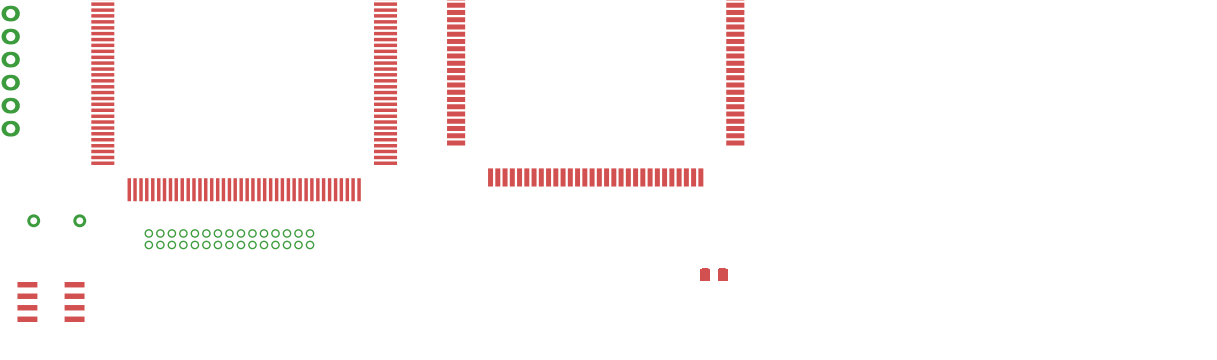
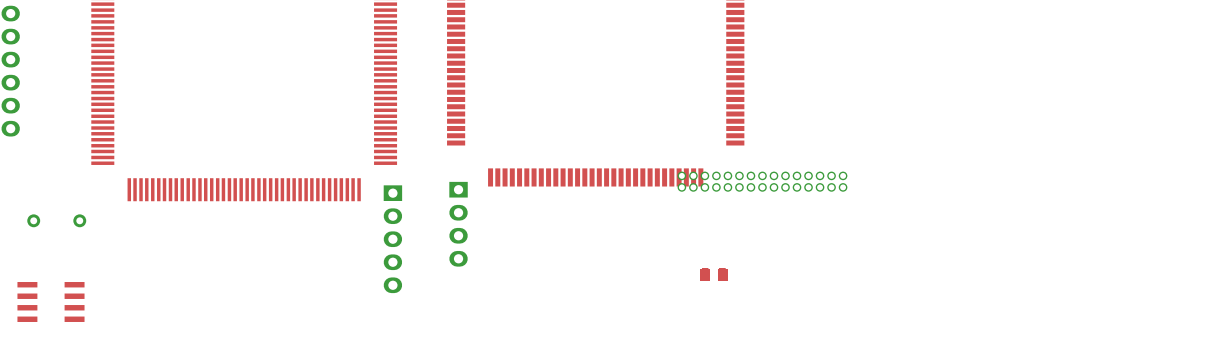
part: none -> (762, 181)
part: none -> (458, 224)
part: (229, 239) -> none
part: none -> (392, 239)

